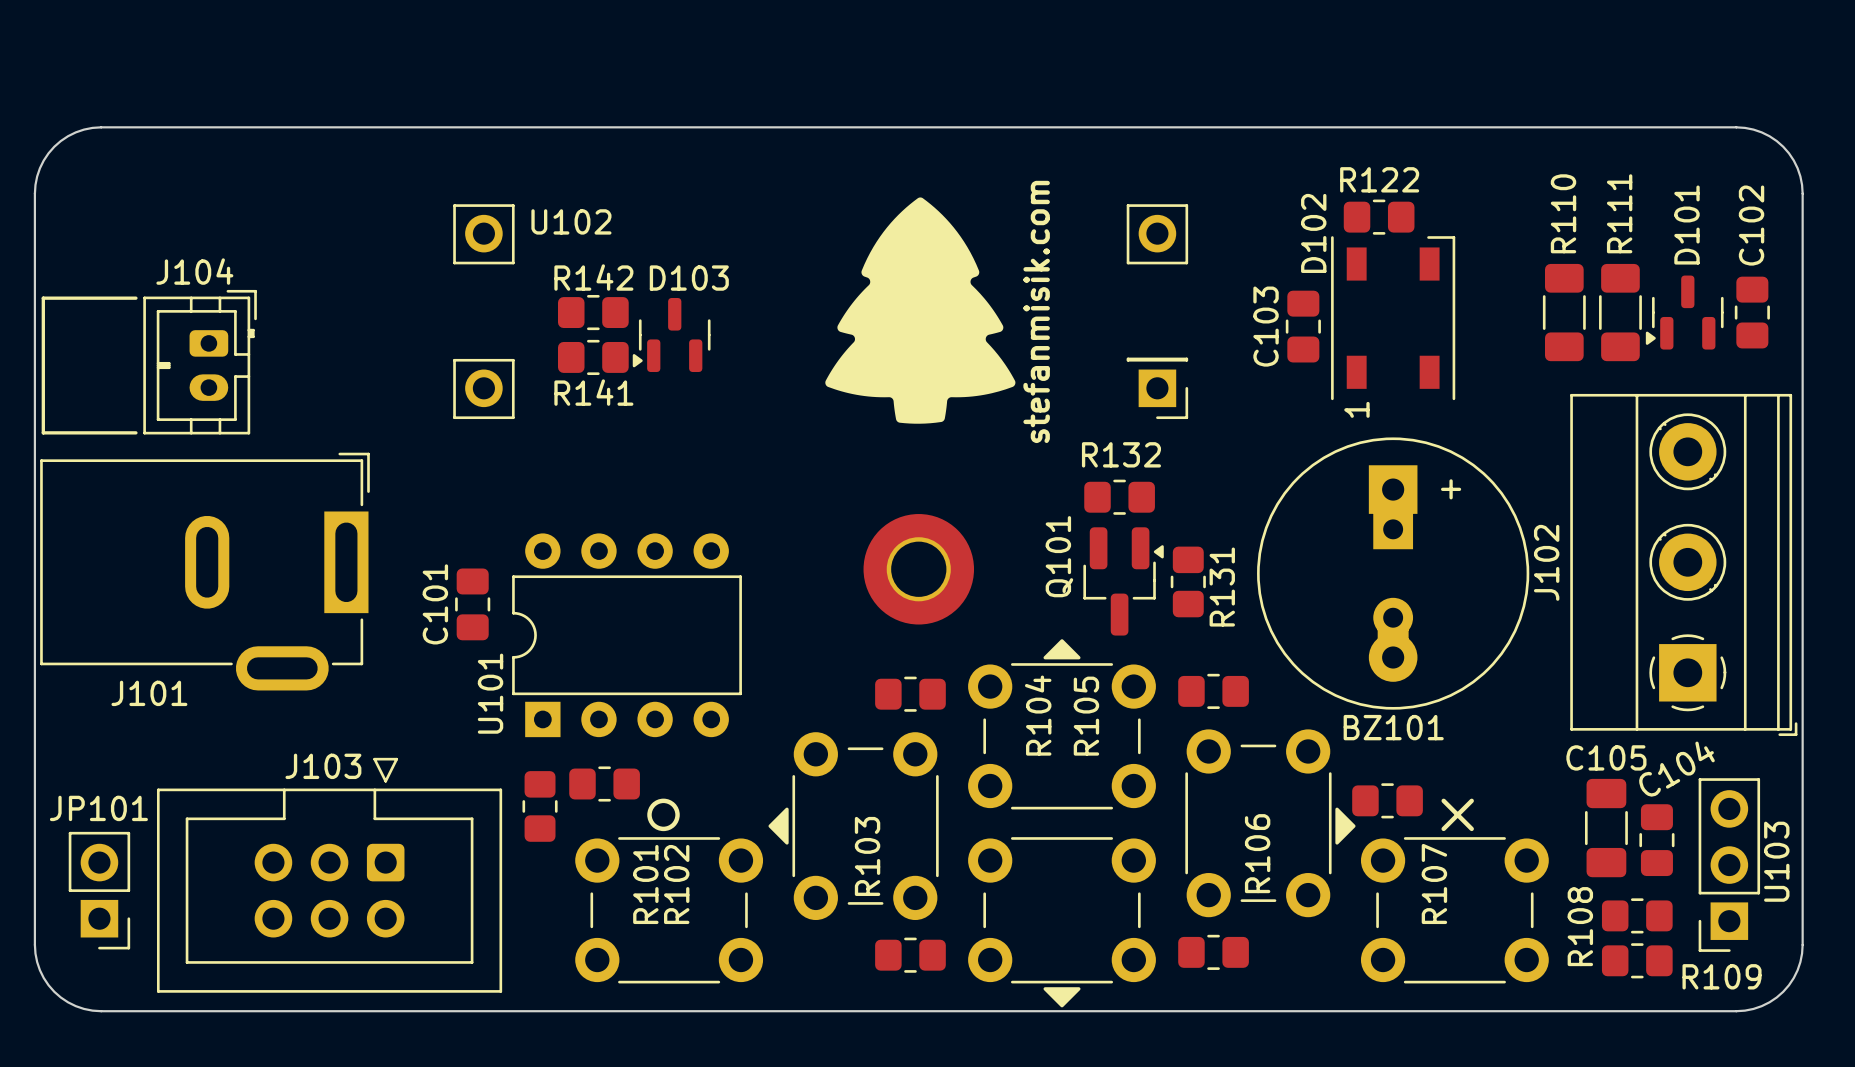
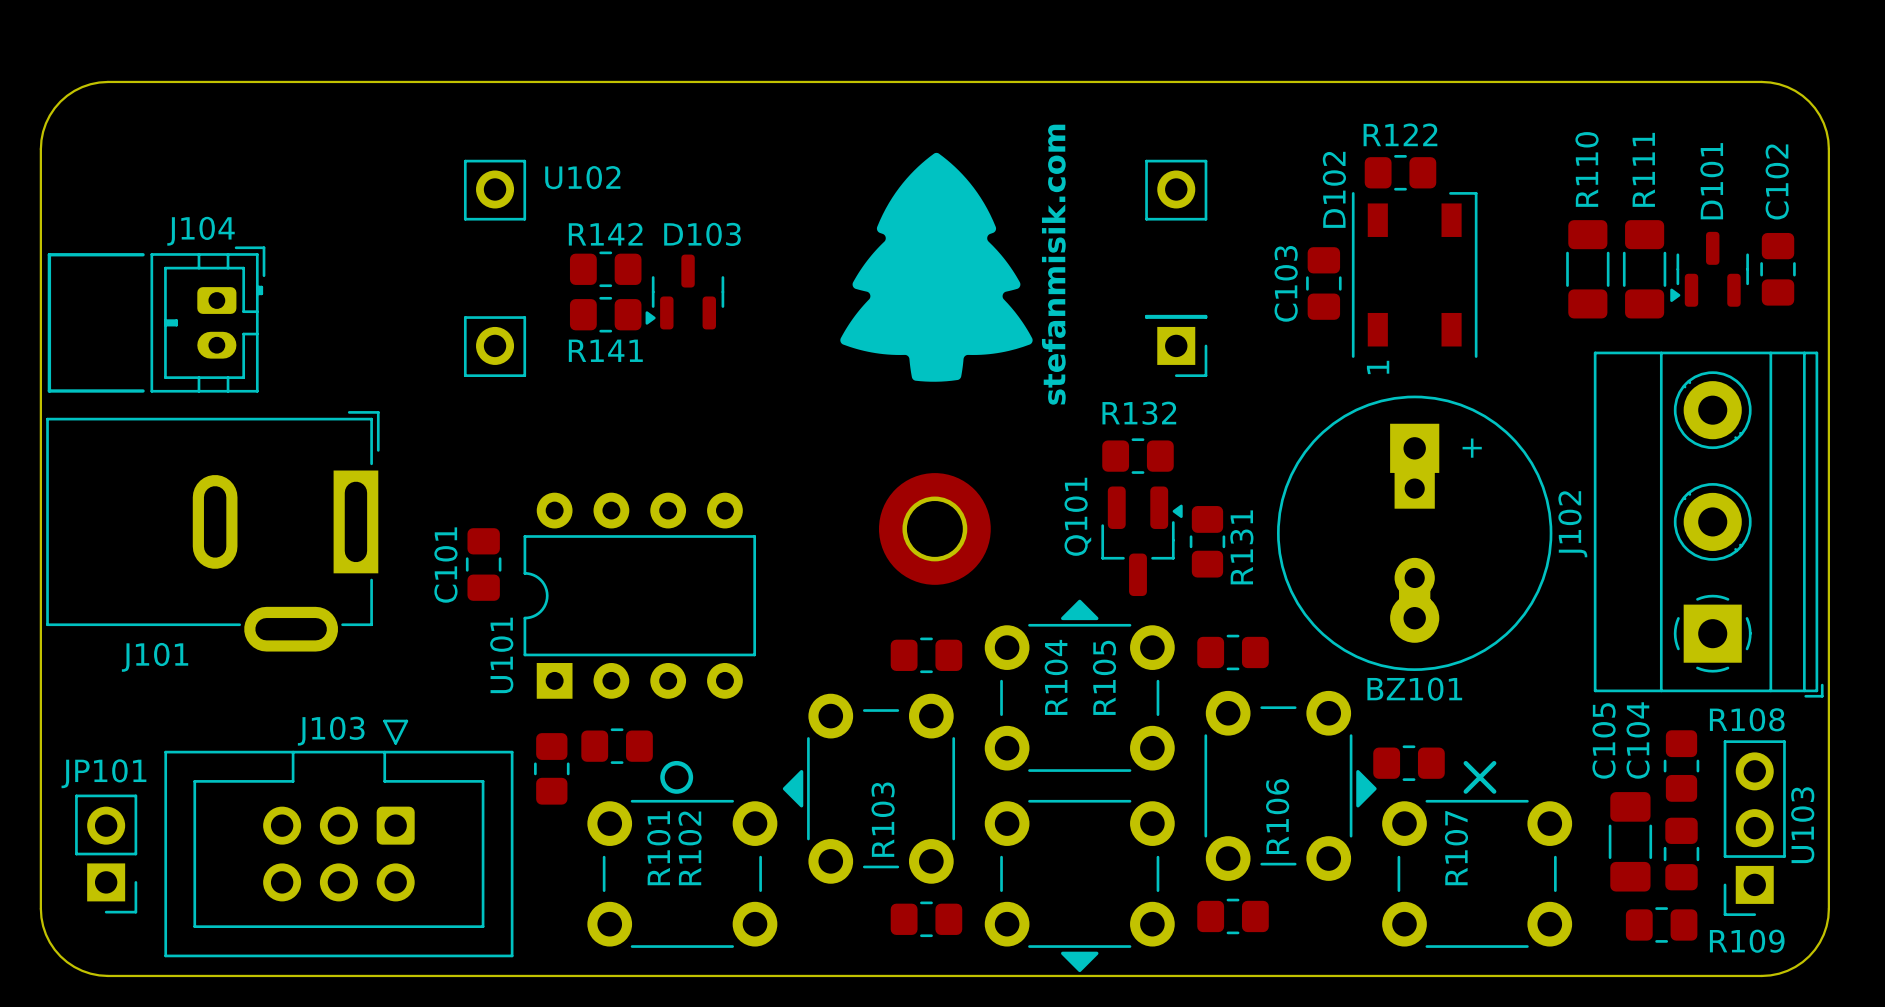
C105 name rotation: 0° (1606, 757) -> 90° counterclockwise (1604, 740)
C104 name rotation: 0° (1676, 769) -> 60° counterclockwise (1638, 740)
C105 position: (1606, 828) -> (1630, 841)
C104 position: (1656, 840) -> (1681, 854)
R108 rotation: 0° (1637, 915) -> 90° clockwise (1681, 766)
R108 position: (1637, 915) -> (1681, 766)
R108 name position: R108 (1580, 926) -> R108 (1747, 719)

